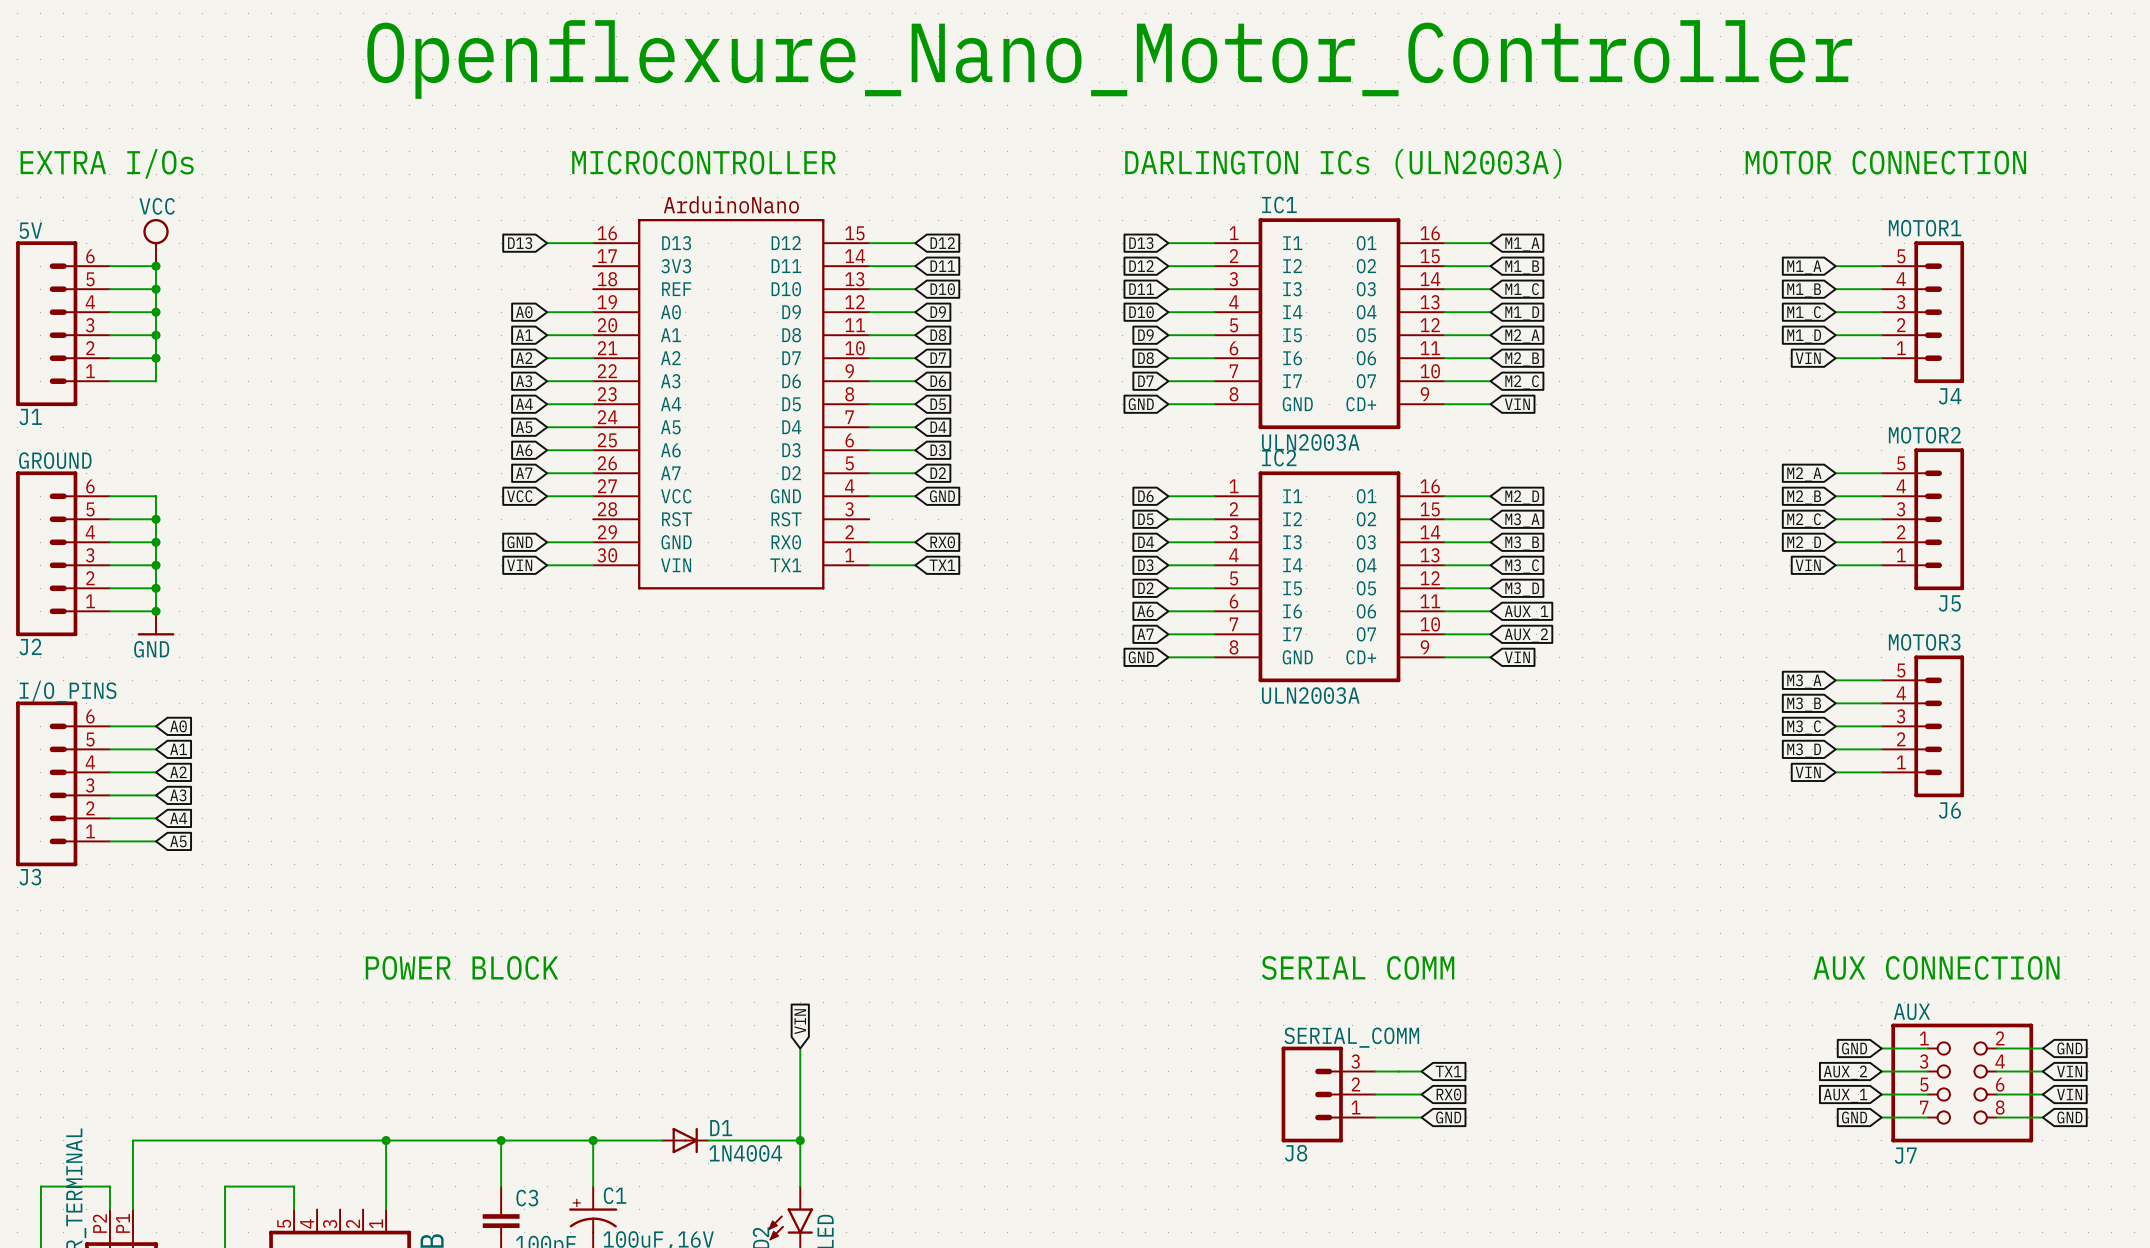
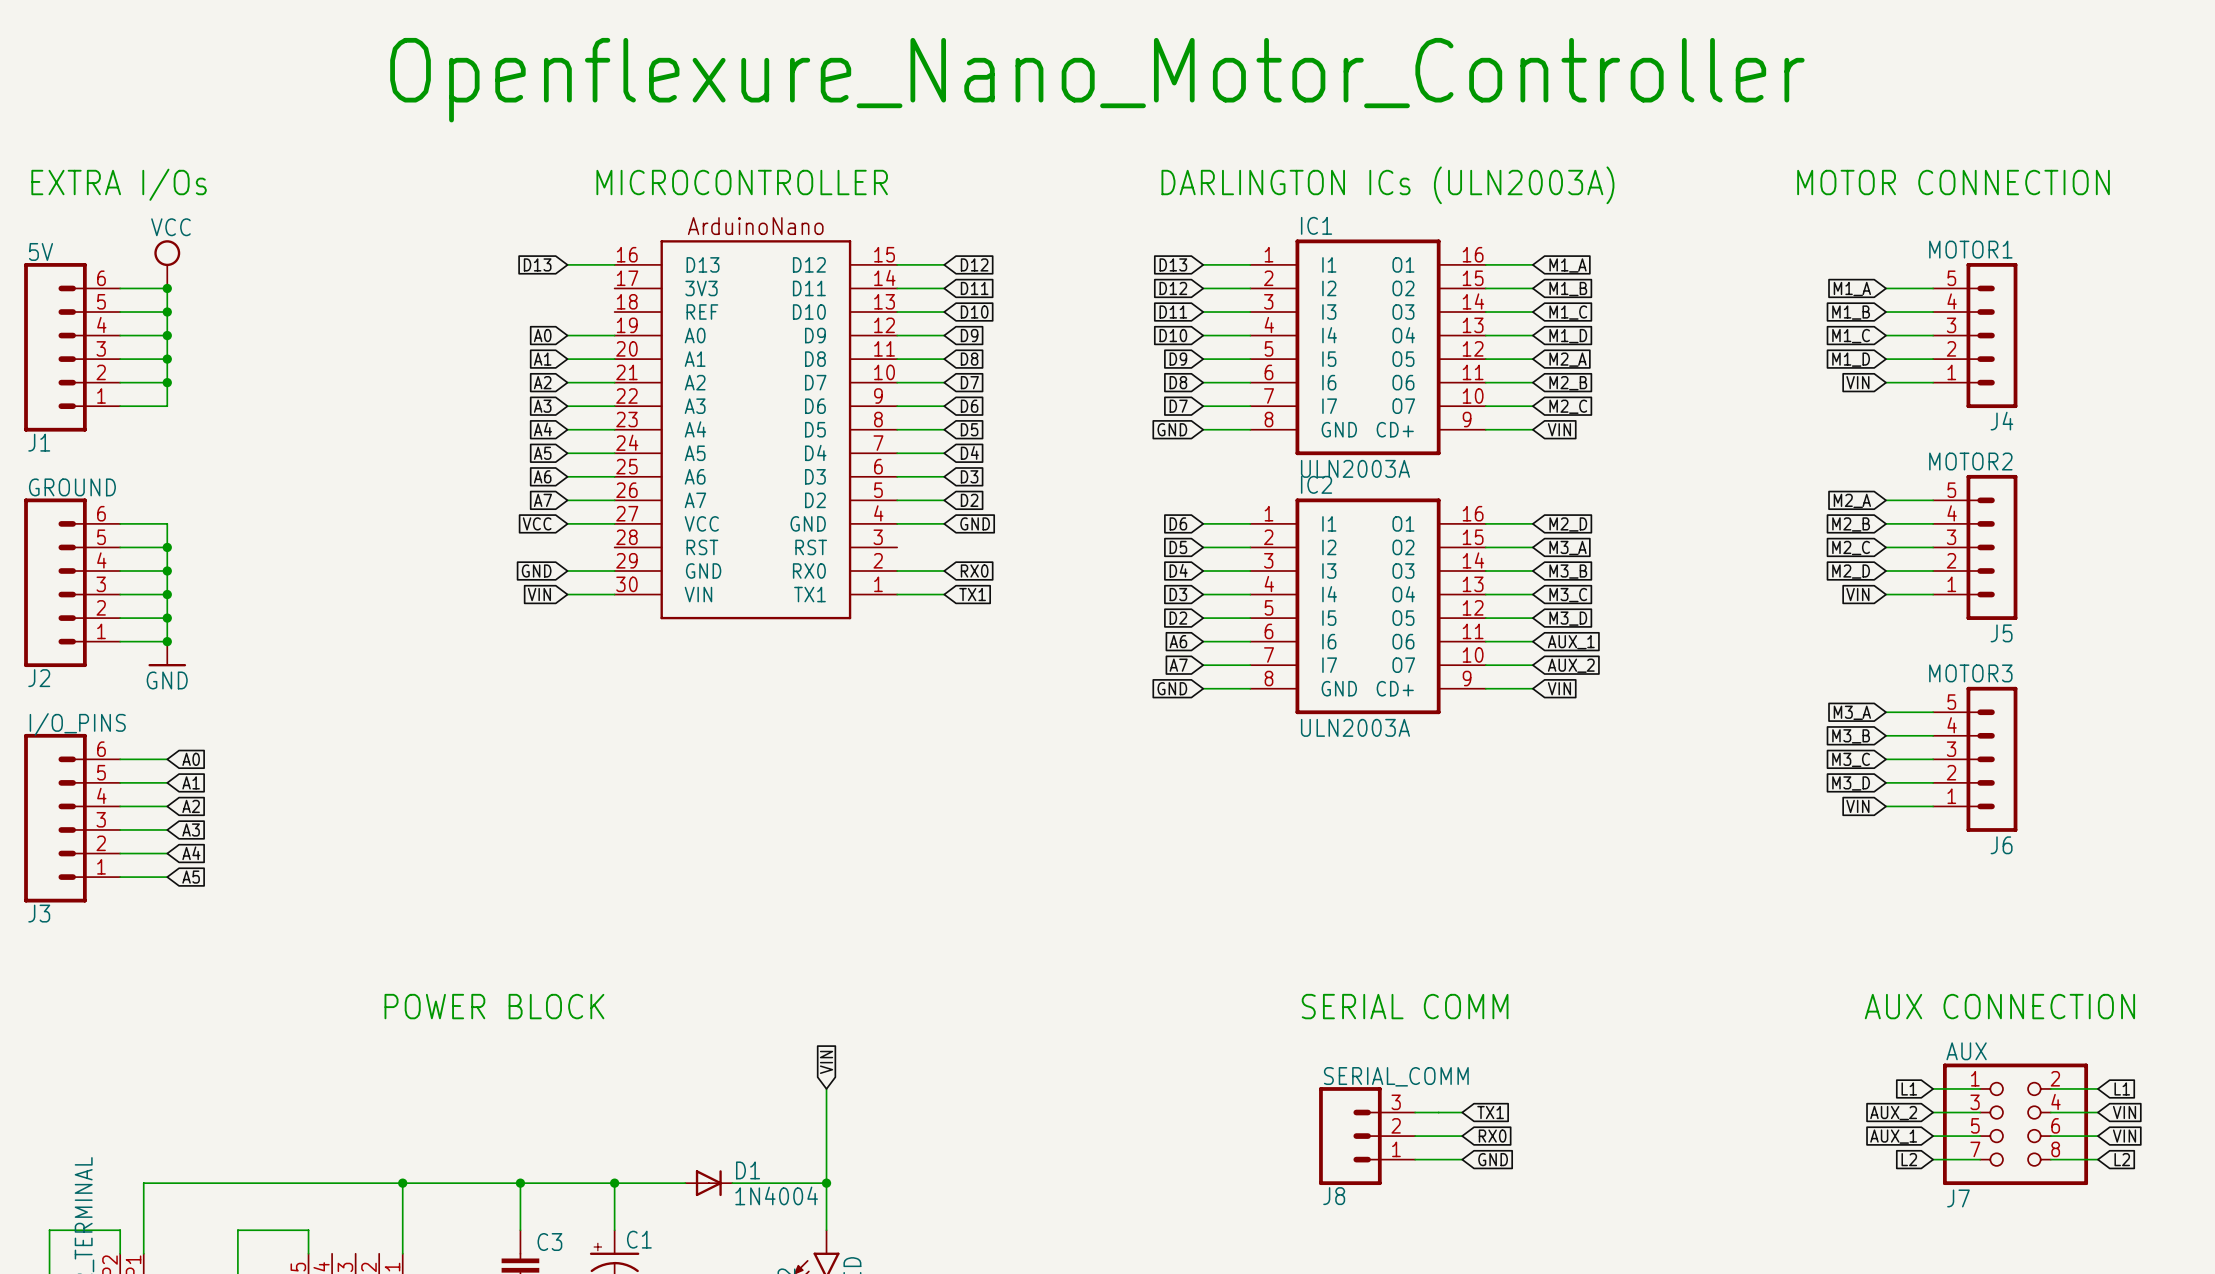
global label: GND (1854, 1048) -> L1 (1909, 1088)
global label: GND (2069, 1048) -> L1 (2122, 1088)
global label: GND (1854, 1117) -> L2 (1909, 1159)
global label: GND (2069, 1117) -> L2 (2122, 1159)

